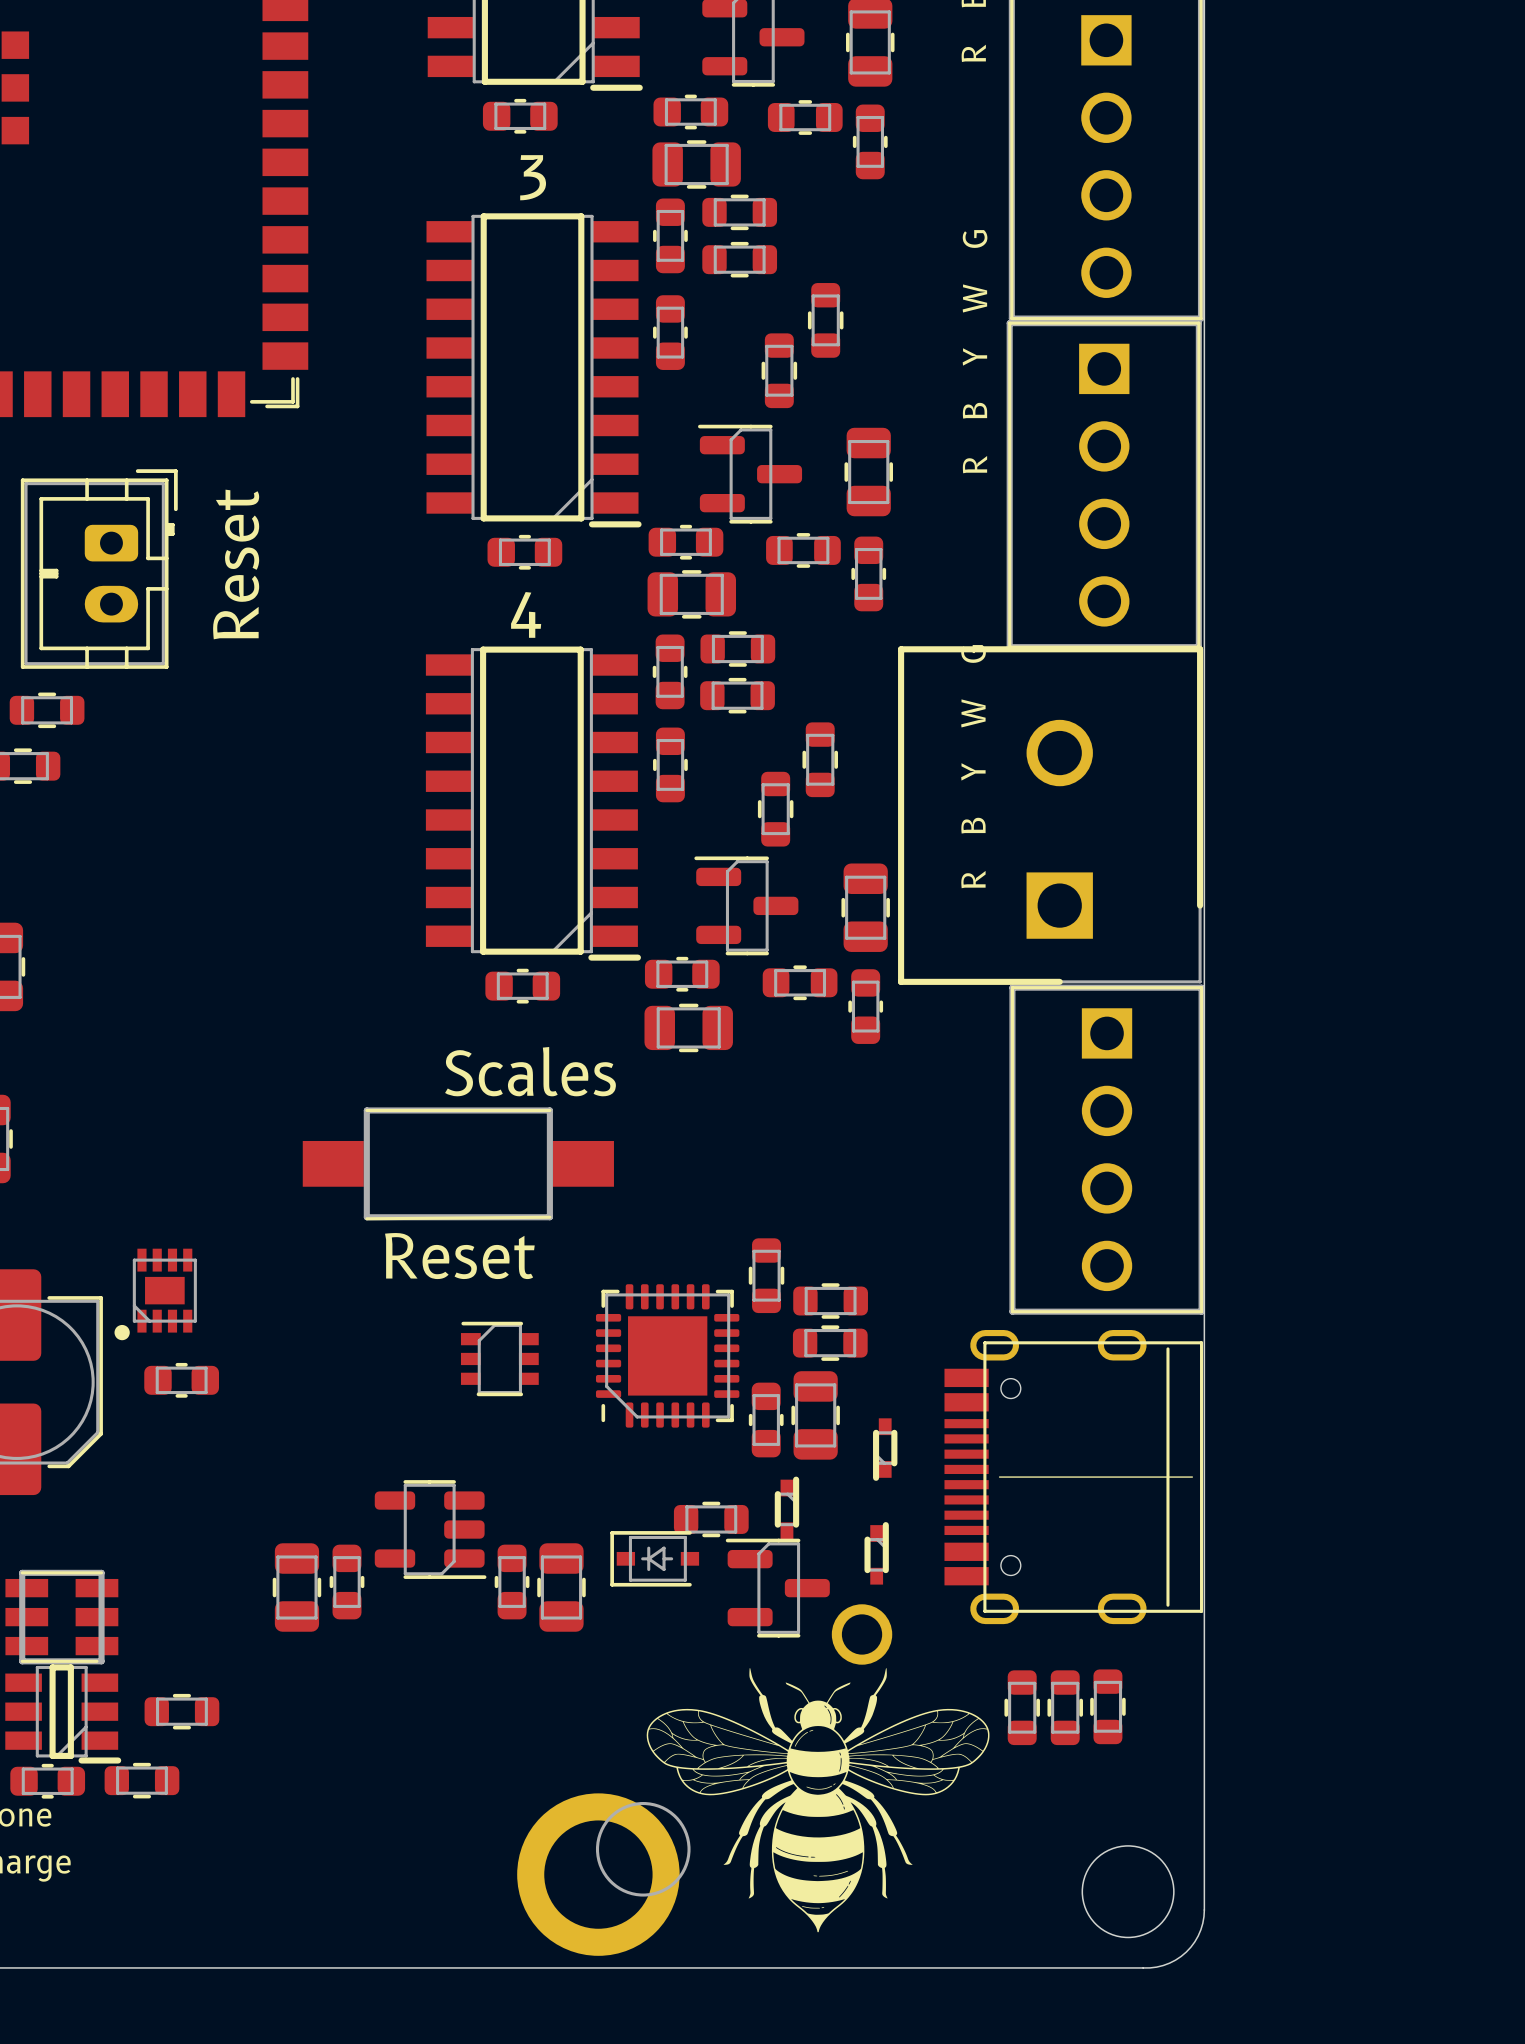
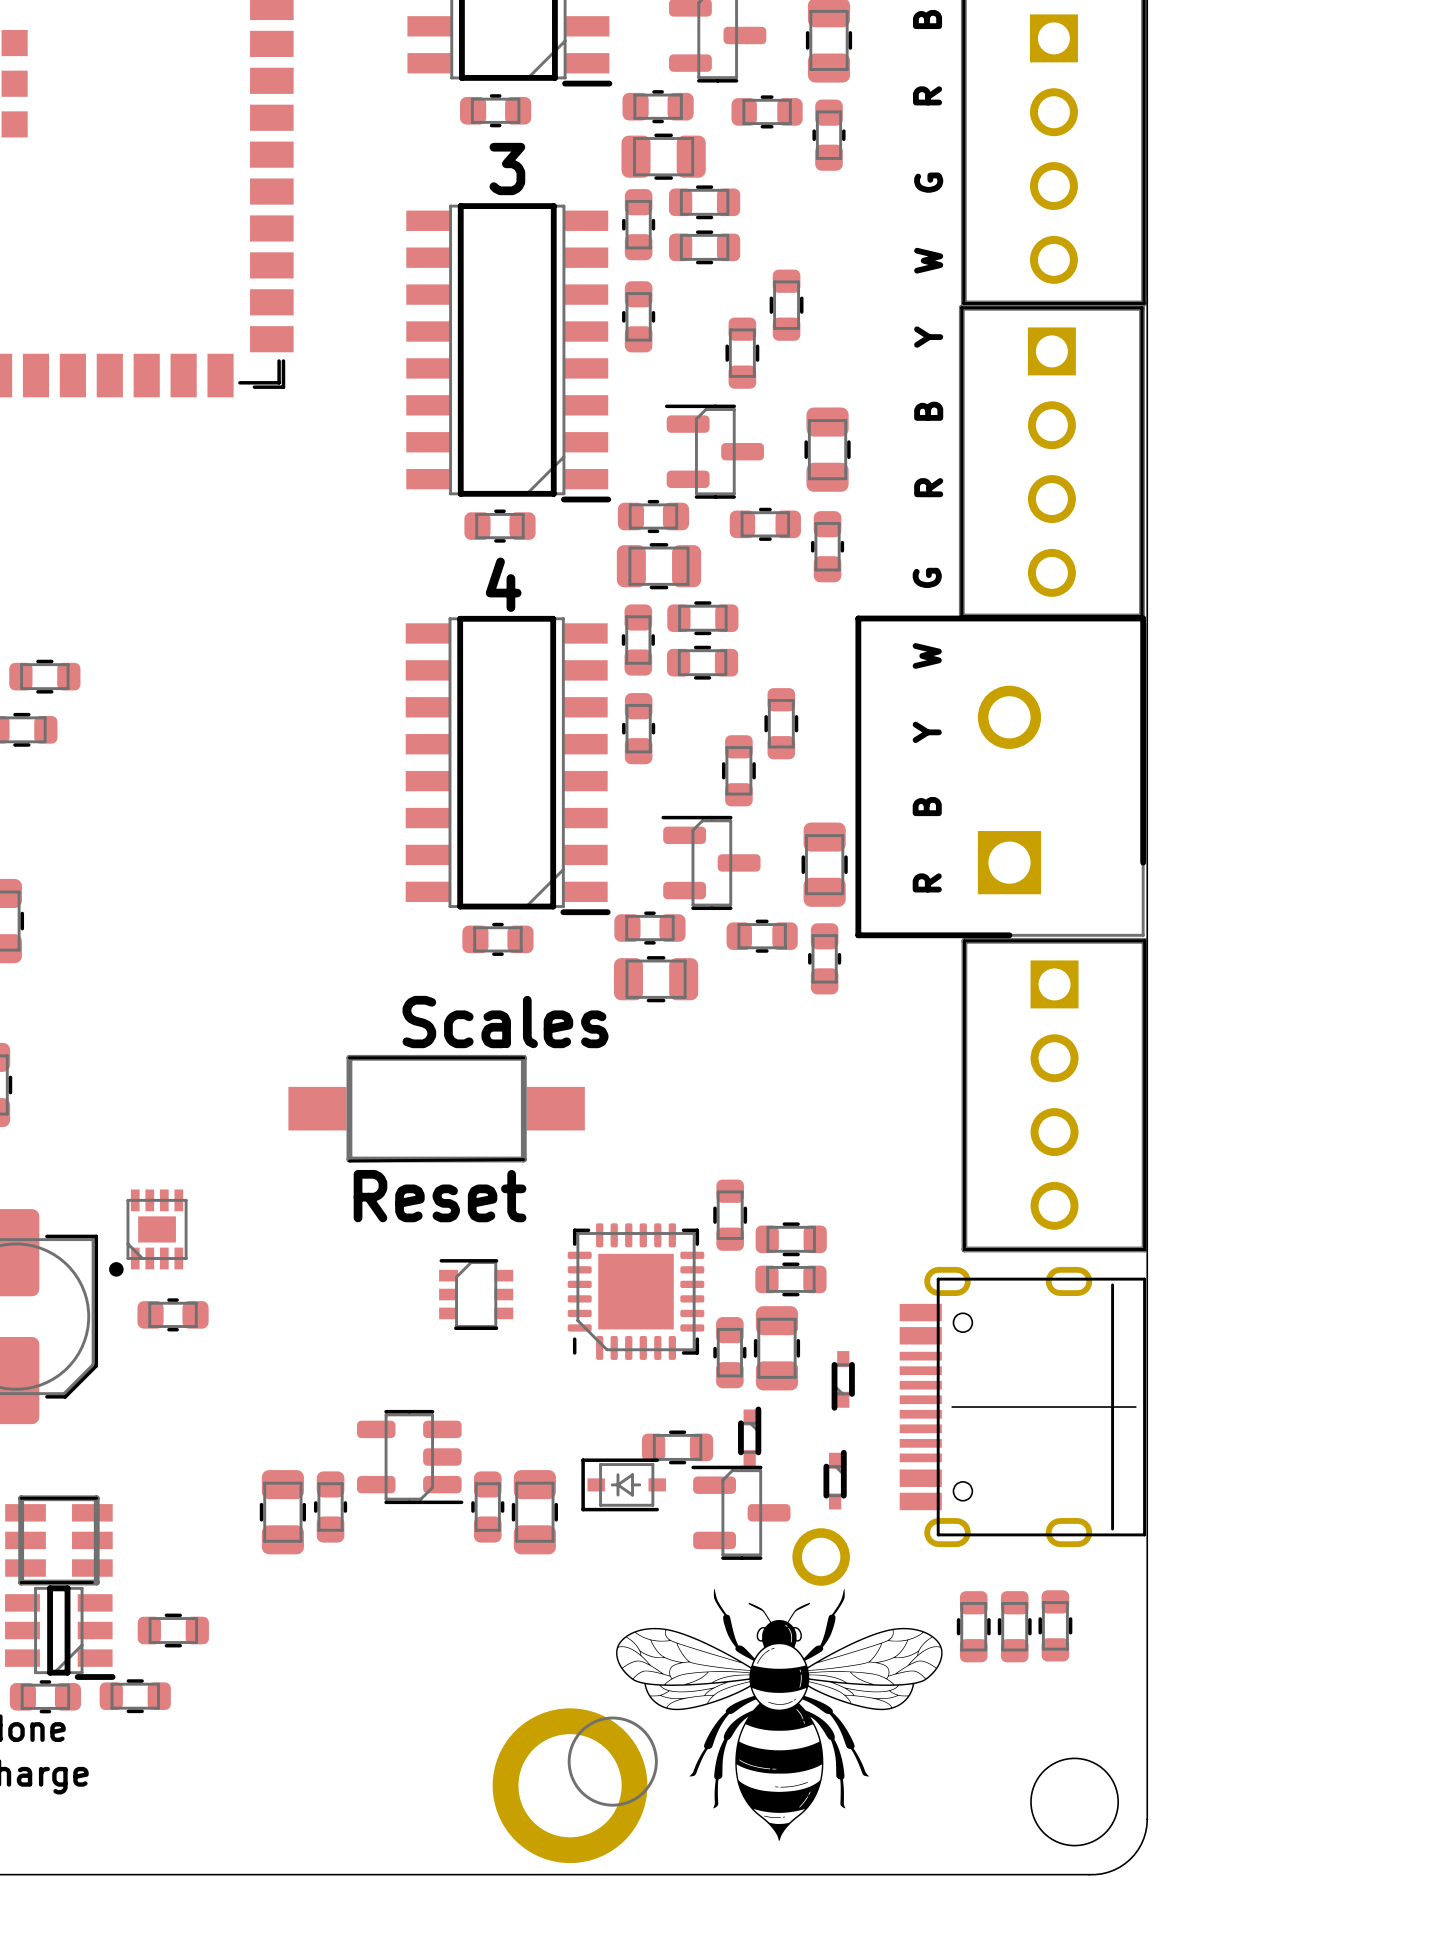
text: Reset (236, 564) -> none
part: (99, 569) -> none

